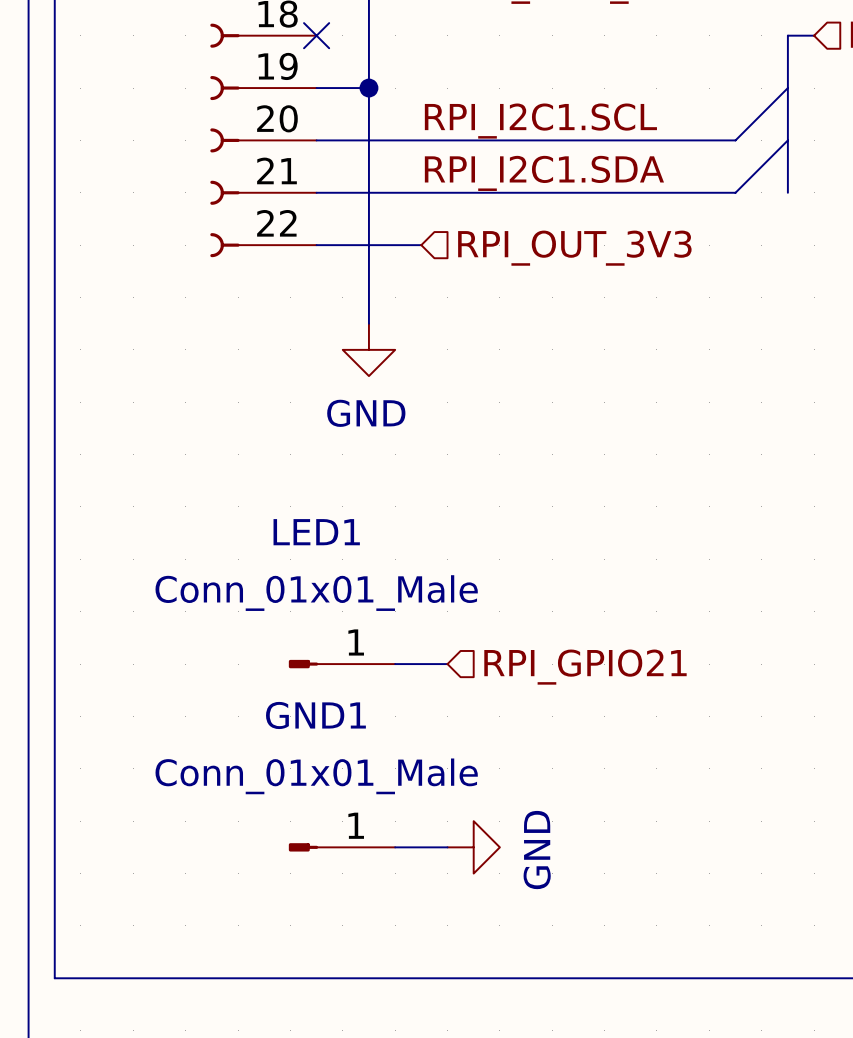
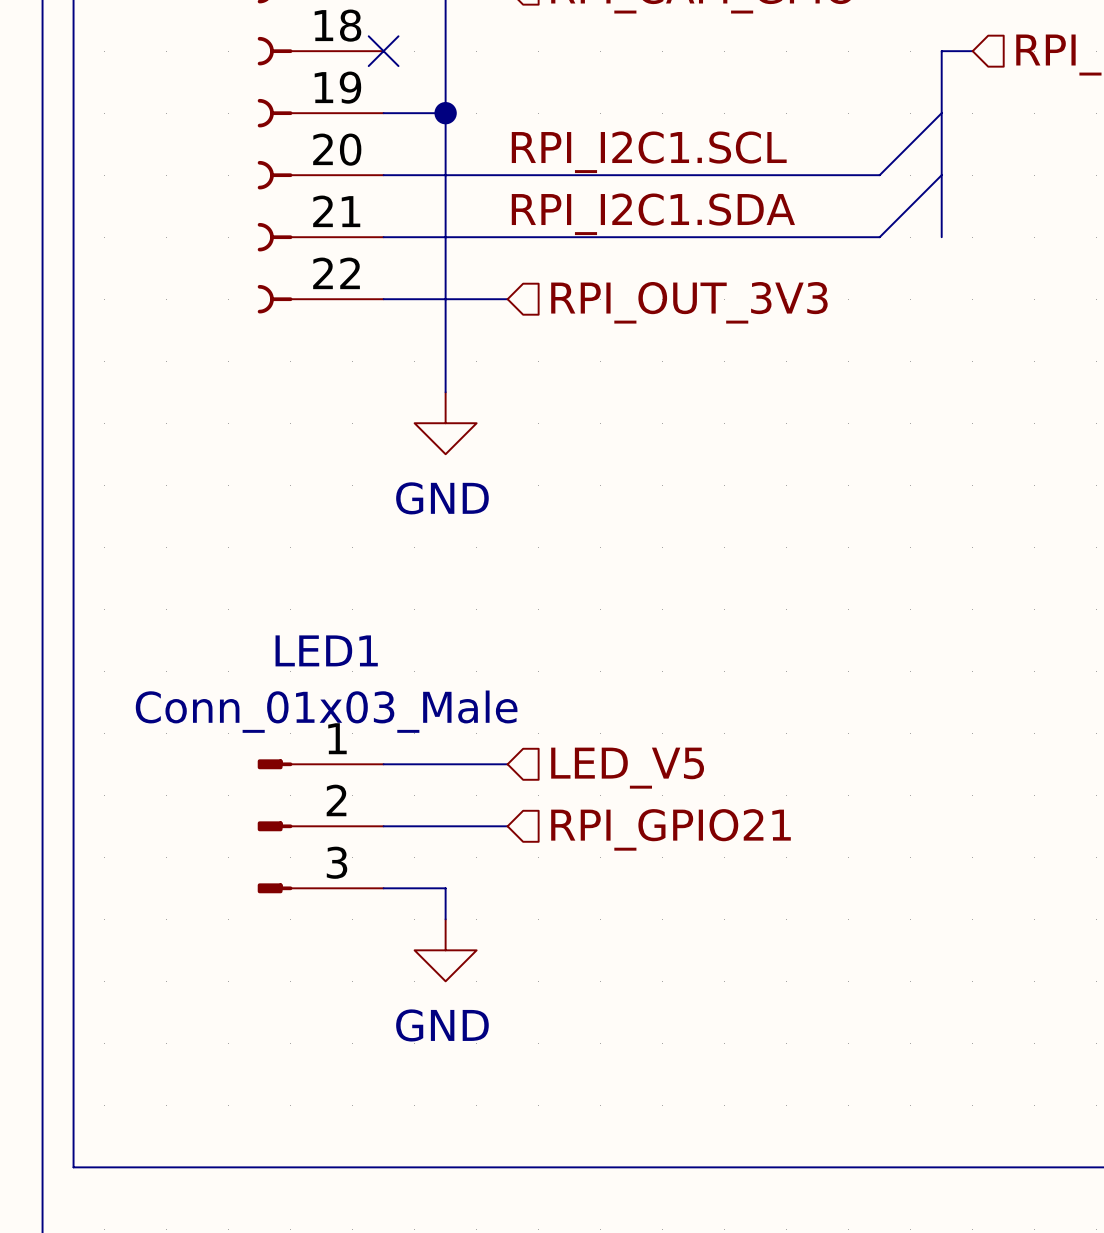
LED1 value: Conn_01x01_Male (316, 593) -> Conn_01x03_Male (326, 711)
wire: none -> (383, 764) (507, 764)
hierarchical label: none -> LED_V5 (627, 768)
LED1 symbol: [288, 659, 396, 669] -> [257, 759, 384, 894]
wire: (395, 664) (447, 664) -> none
hierarchical label position: RPI_GPIO21 (585, 667) -> RPI_GPIO21 (670, 829)
wire: none -> (383, 826) (507, 826)
wire: none -> (383, 888) (445, 888) (445, 919)
GND1: Conn_01x01_Male (342, 847) -> none
wire: (395, 847) (447, 847) -> none
power symbol rotation: 0° (473, 847) -> 90° clockwise (445, 950)
power symbol position: GND (473, 847) -> GND (445, 950)

